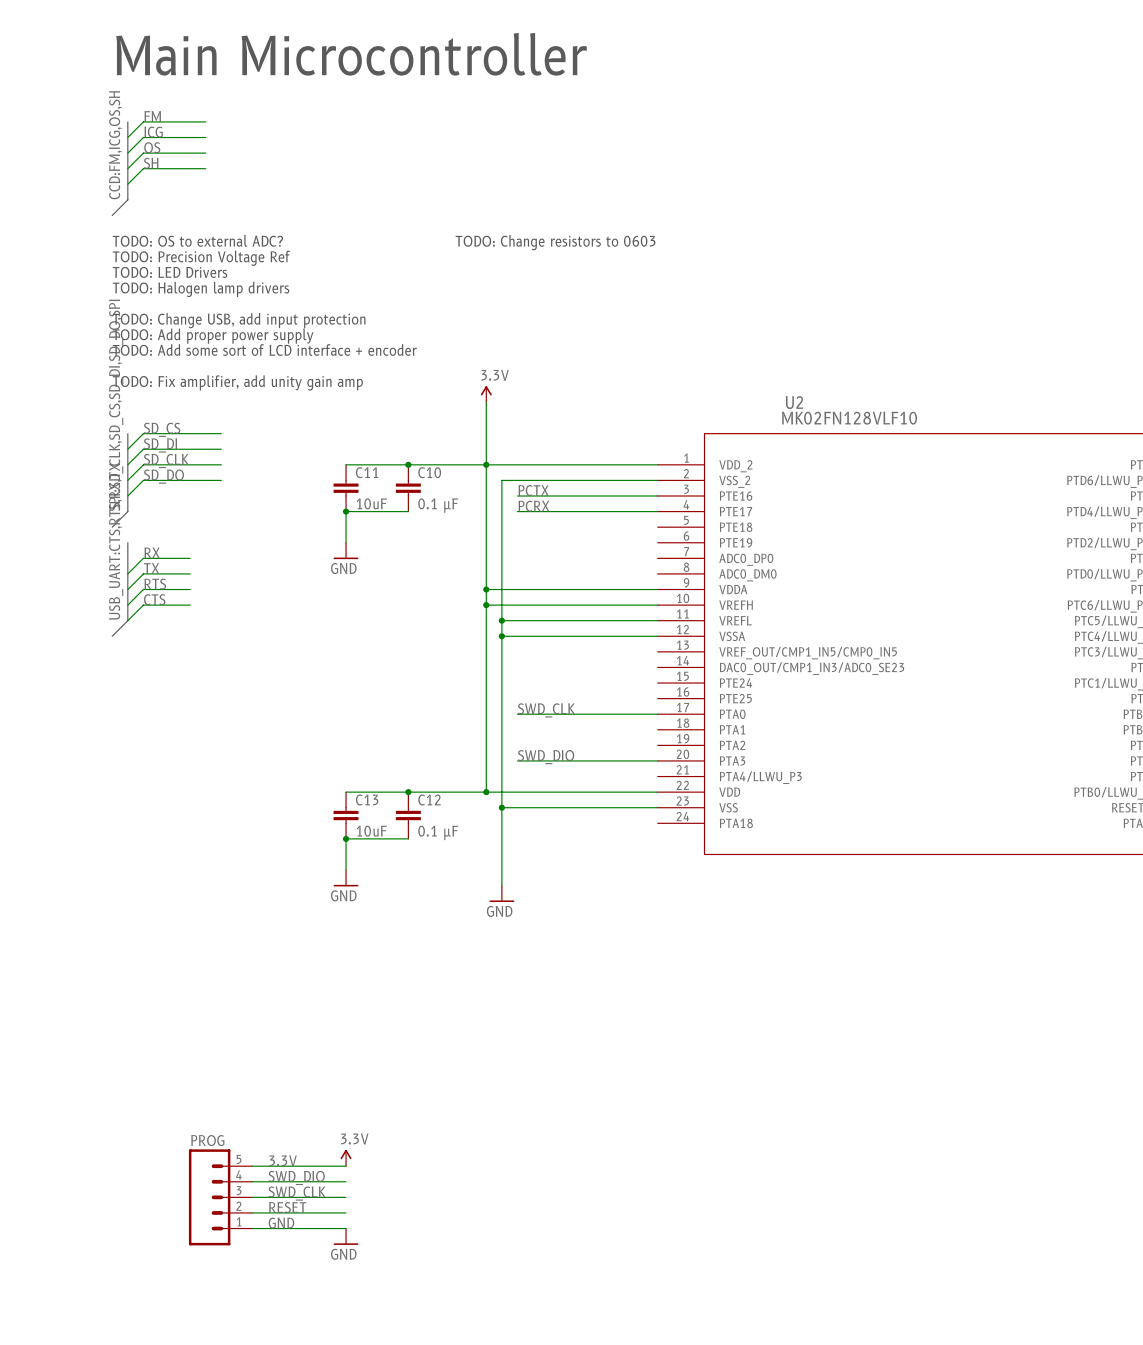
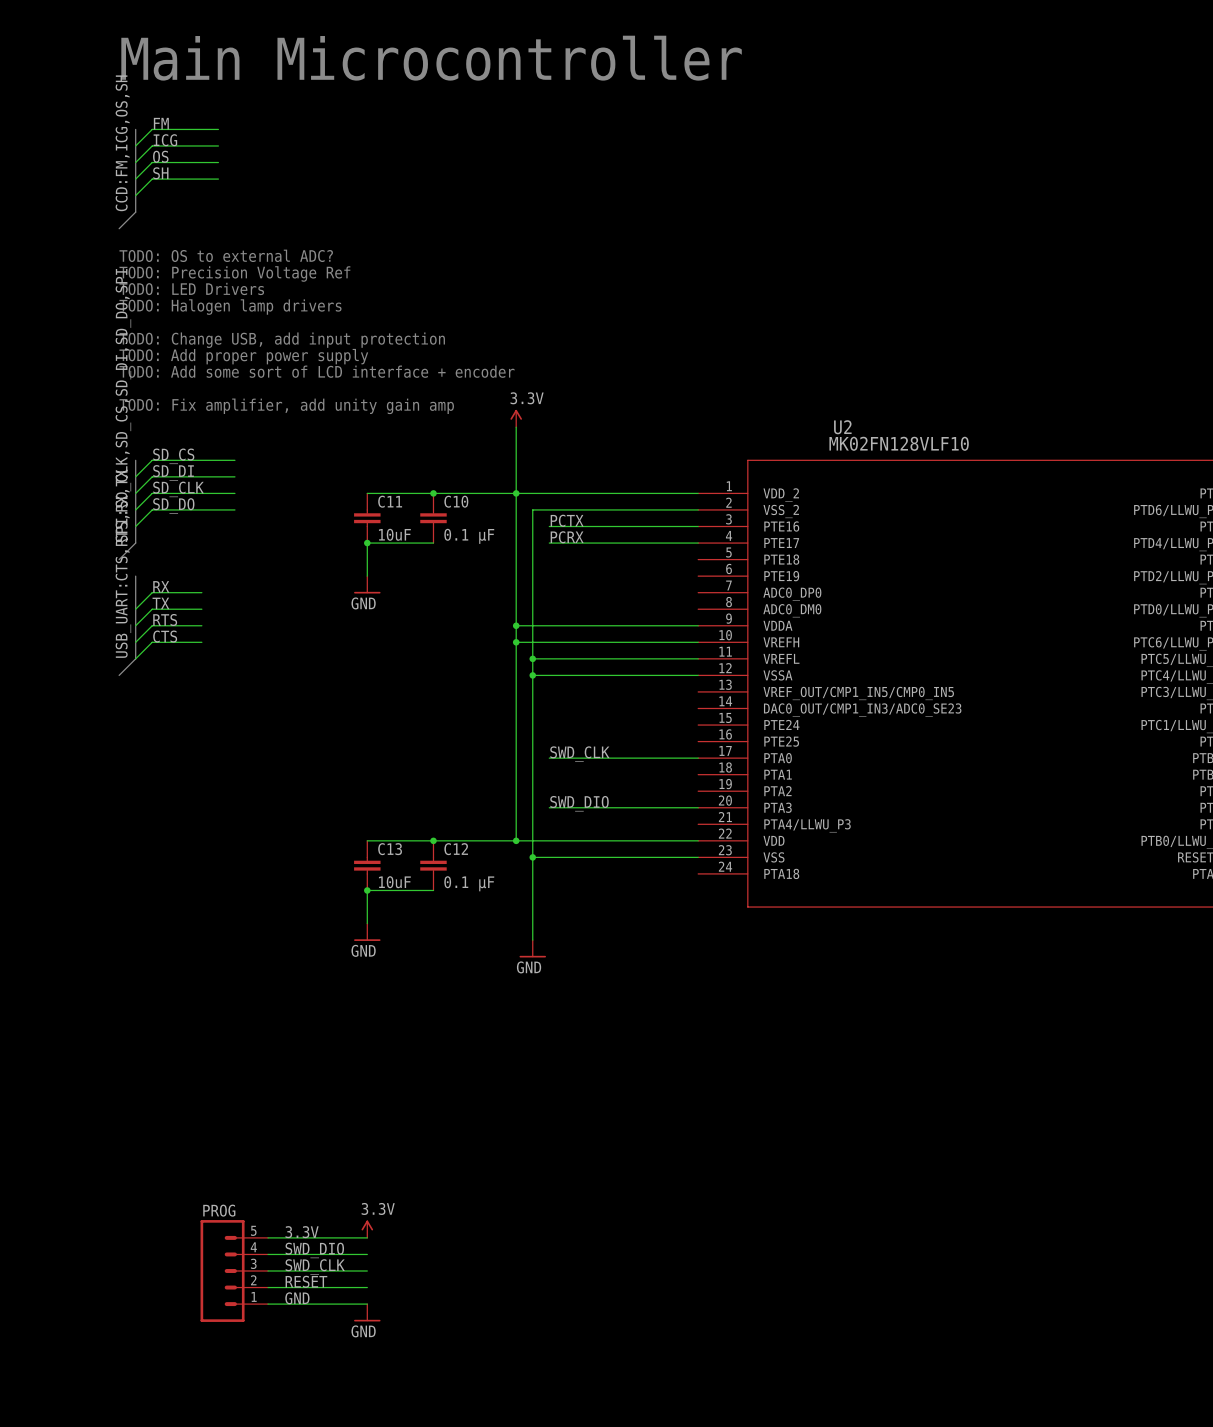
text: TODO: Change resistors to 0603 (555, 242) -> none

